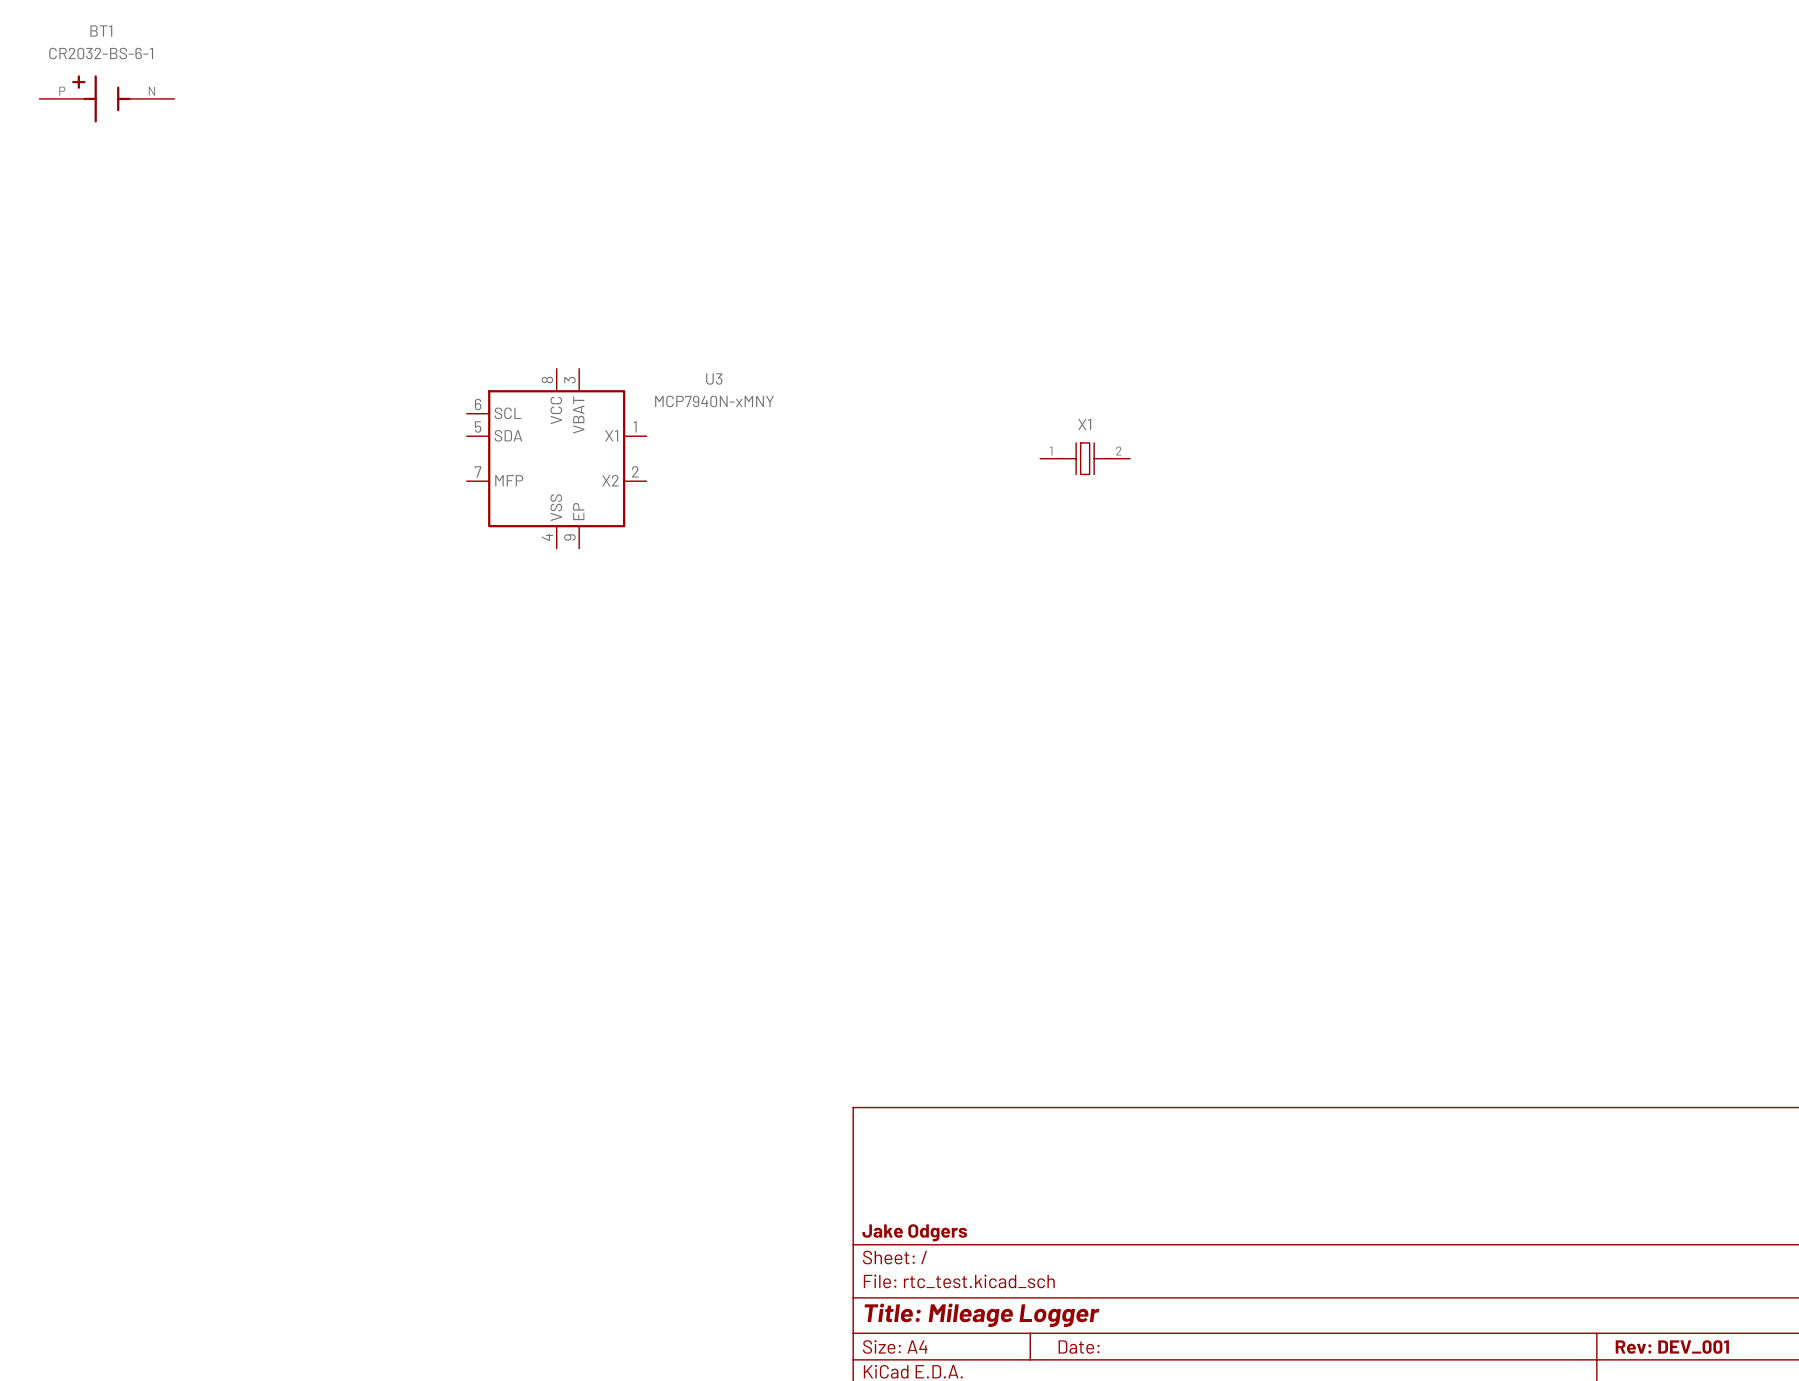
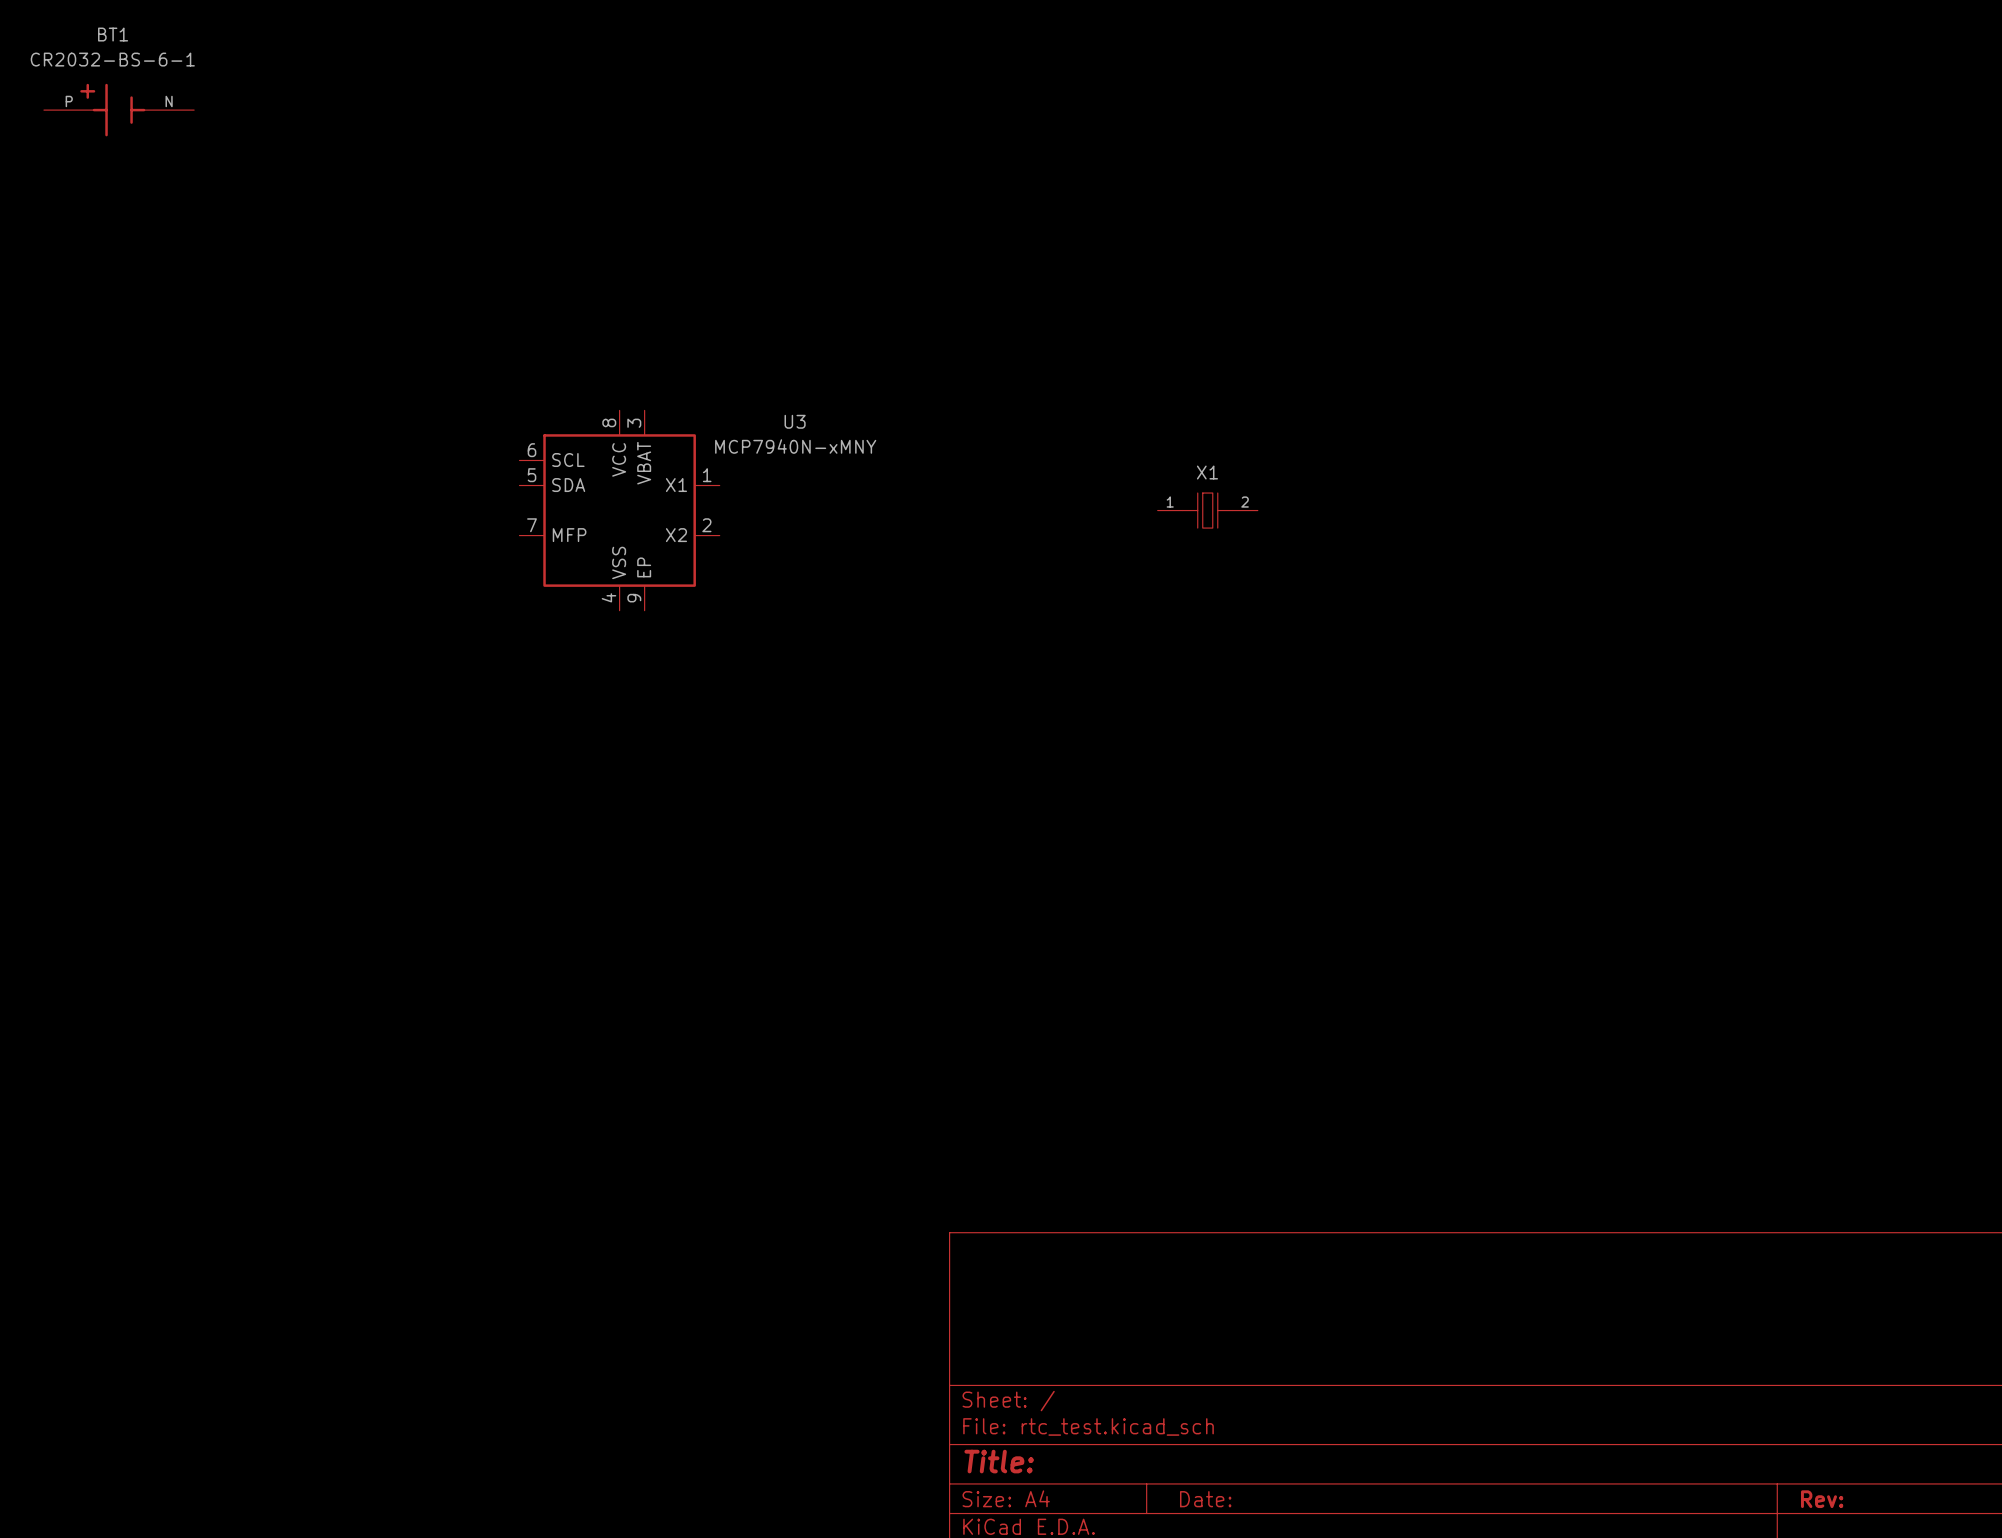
title block: Jake Odgers (914, 1232) -> none
title block: Title: Mileage Logger (982, 1315) -> Title: (999, 1461)
title block: Rev: DEV_001 (1672, 1347) -> Rev: (1822, 1499)

